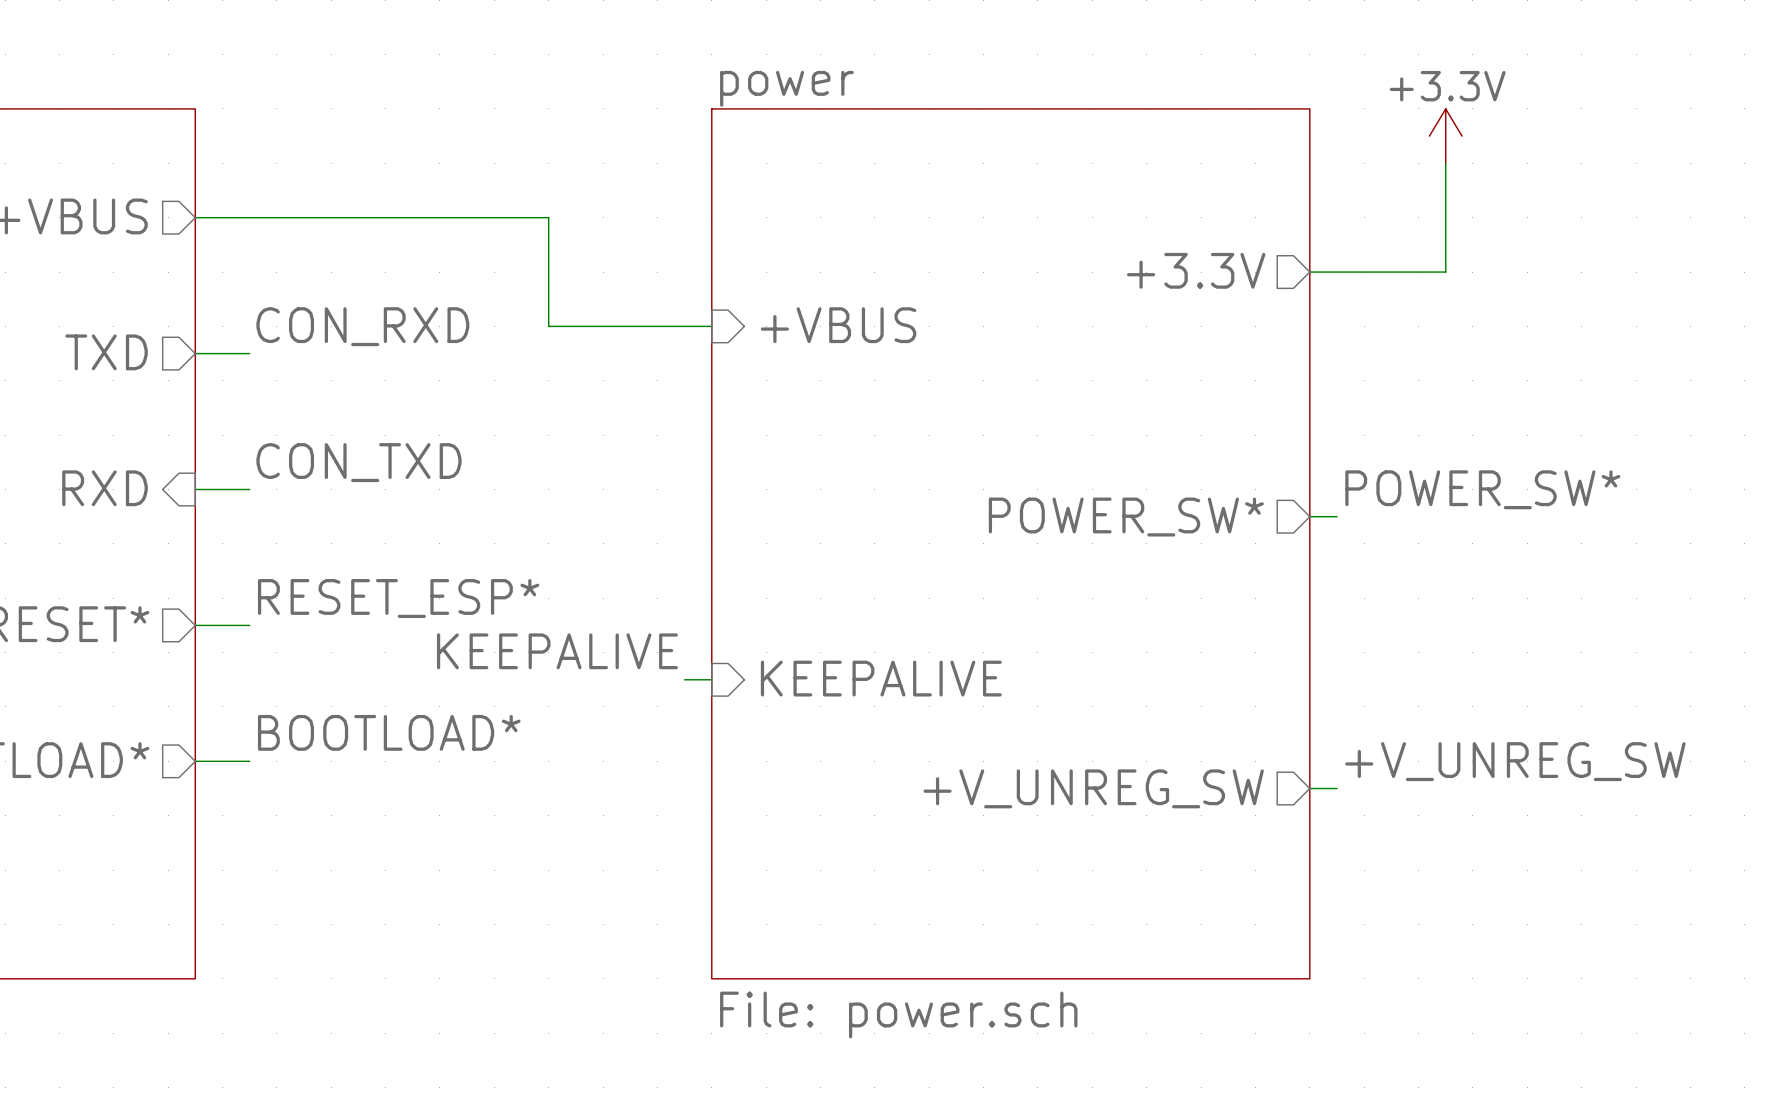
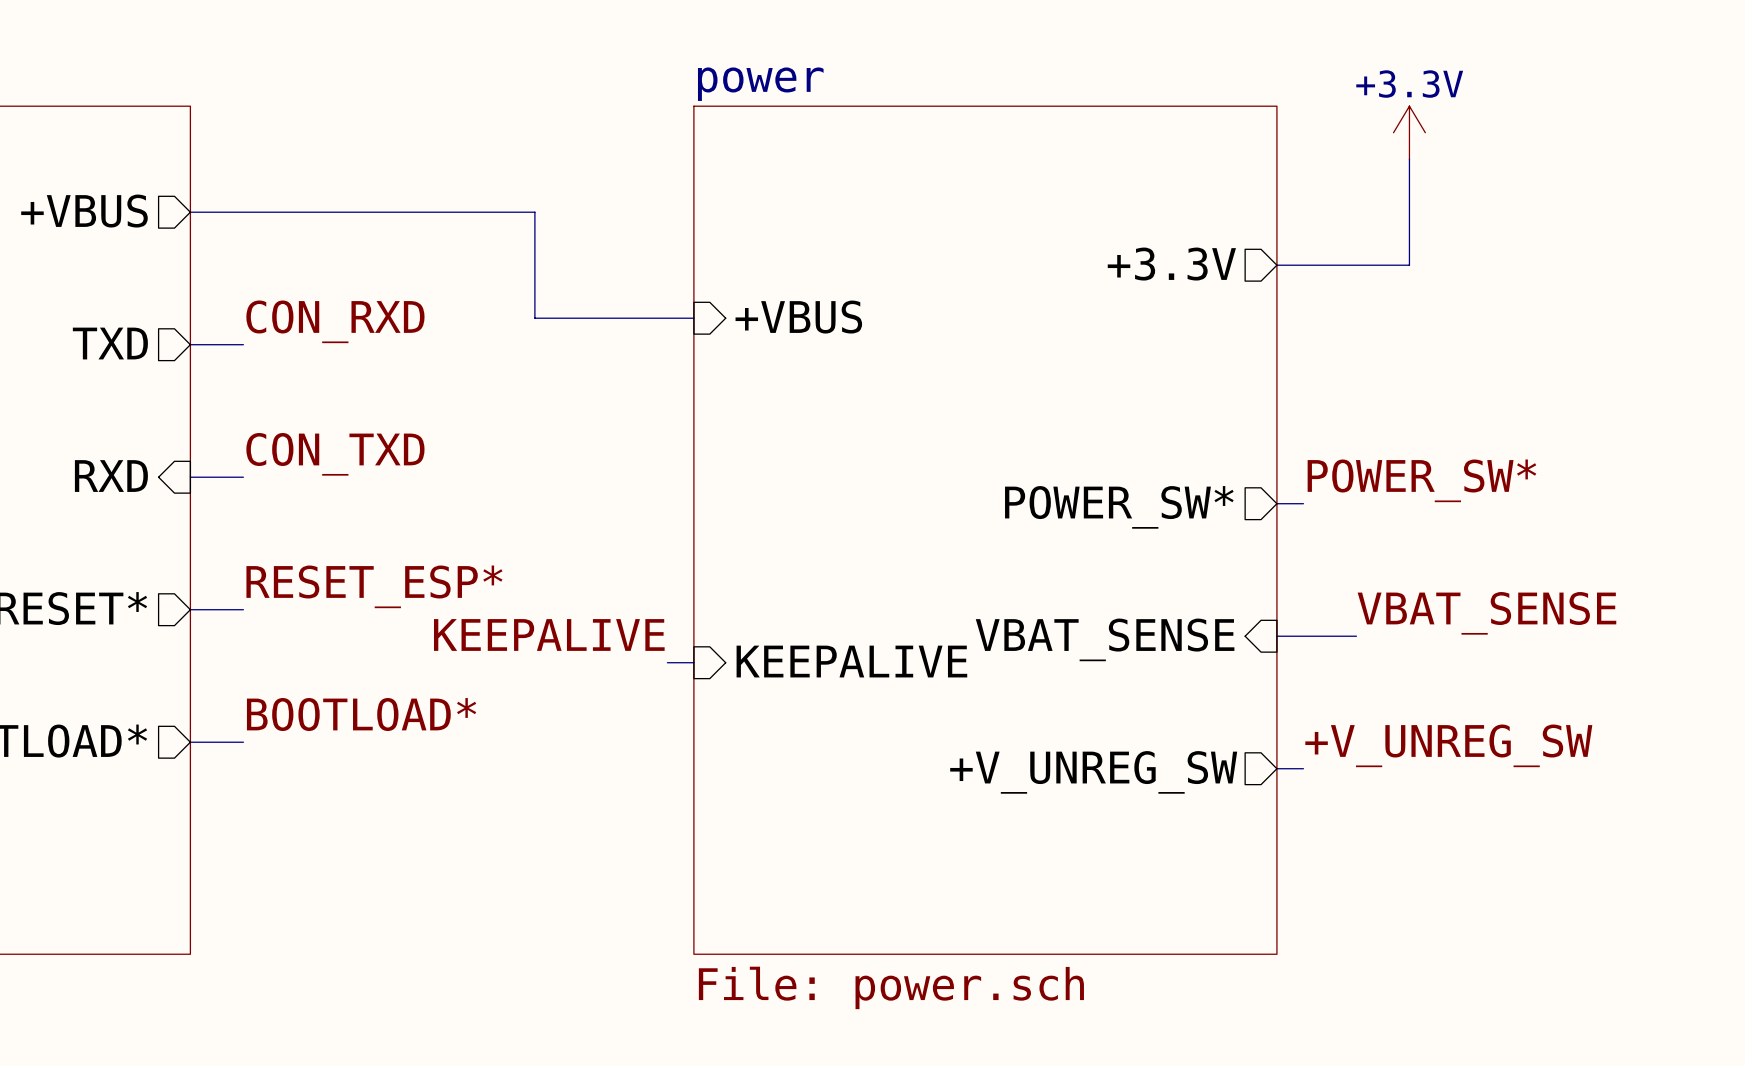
label: none -> VBAT_SENSE (1486, 613)
sheet pin: none -> VBAT_SENSE (1105, 639)
wire: none -> (1276, 636) (1356, 636)

